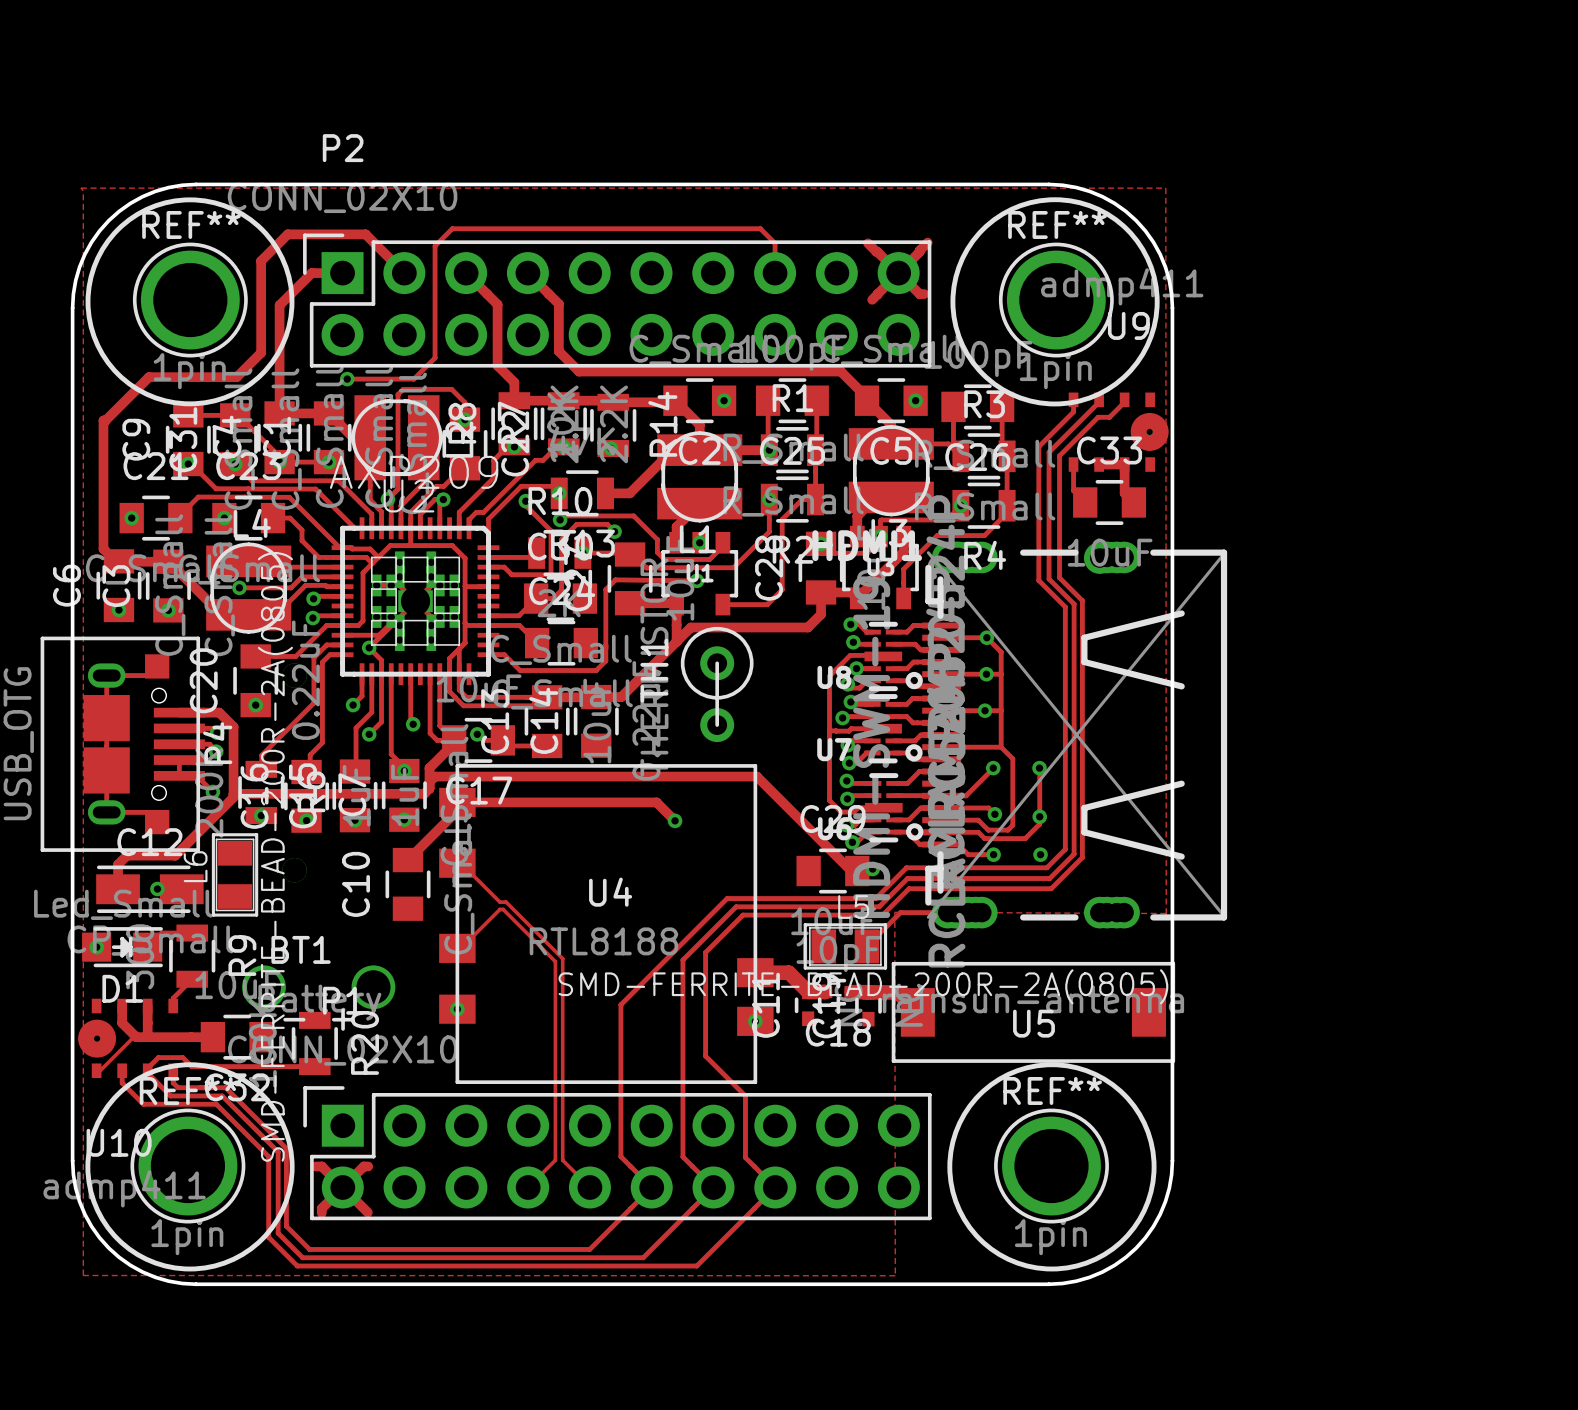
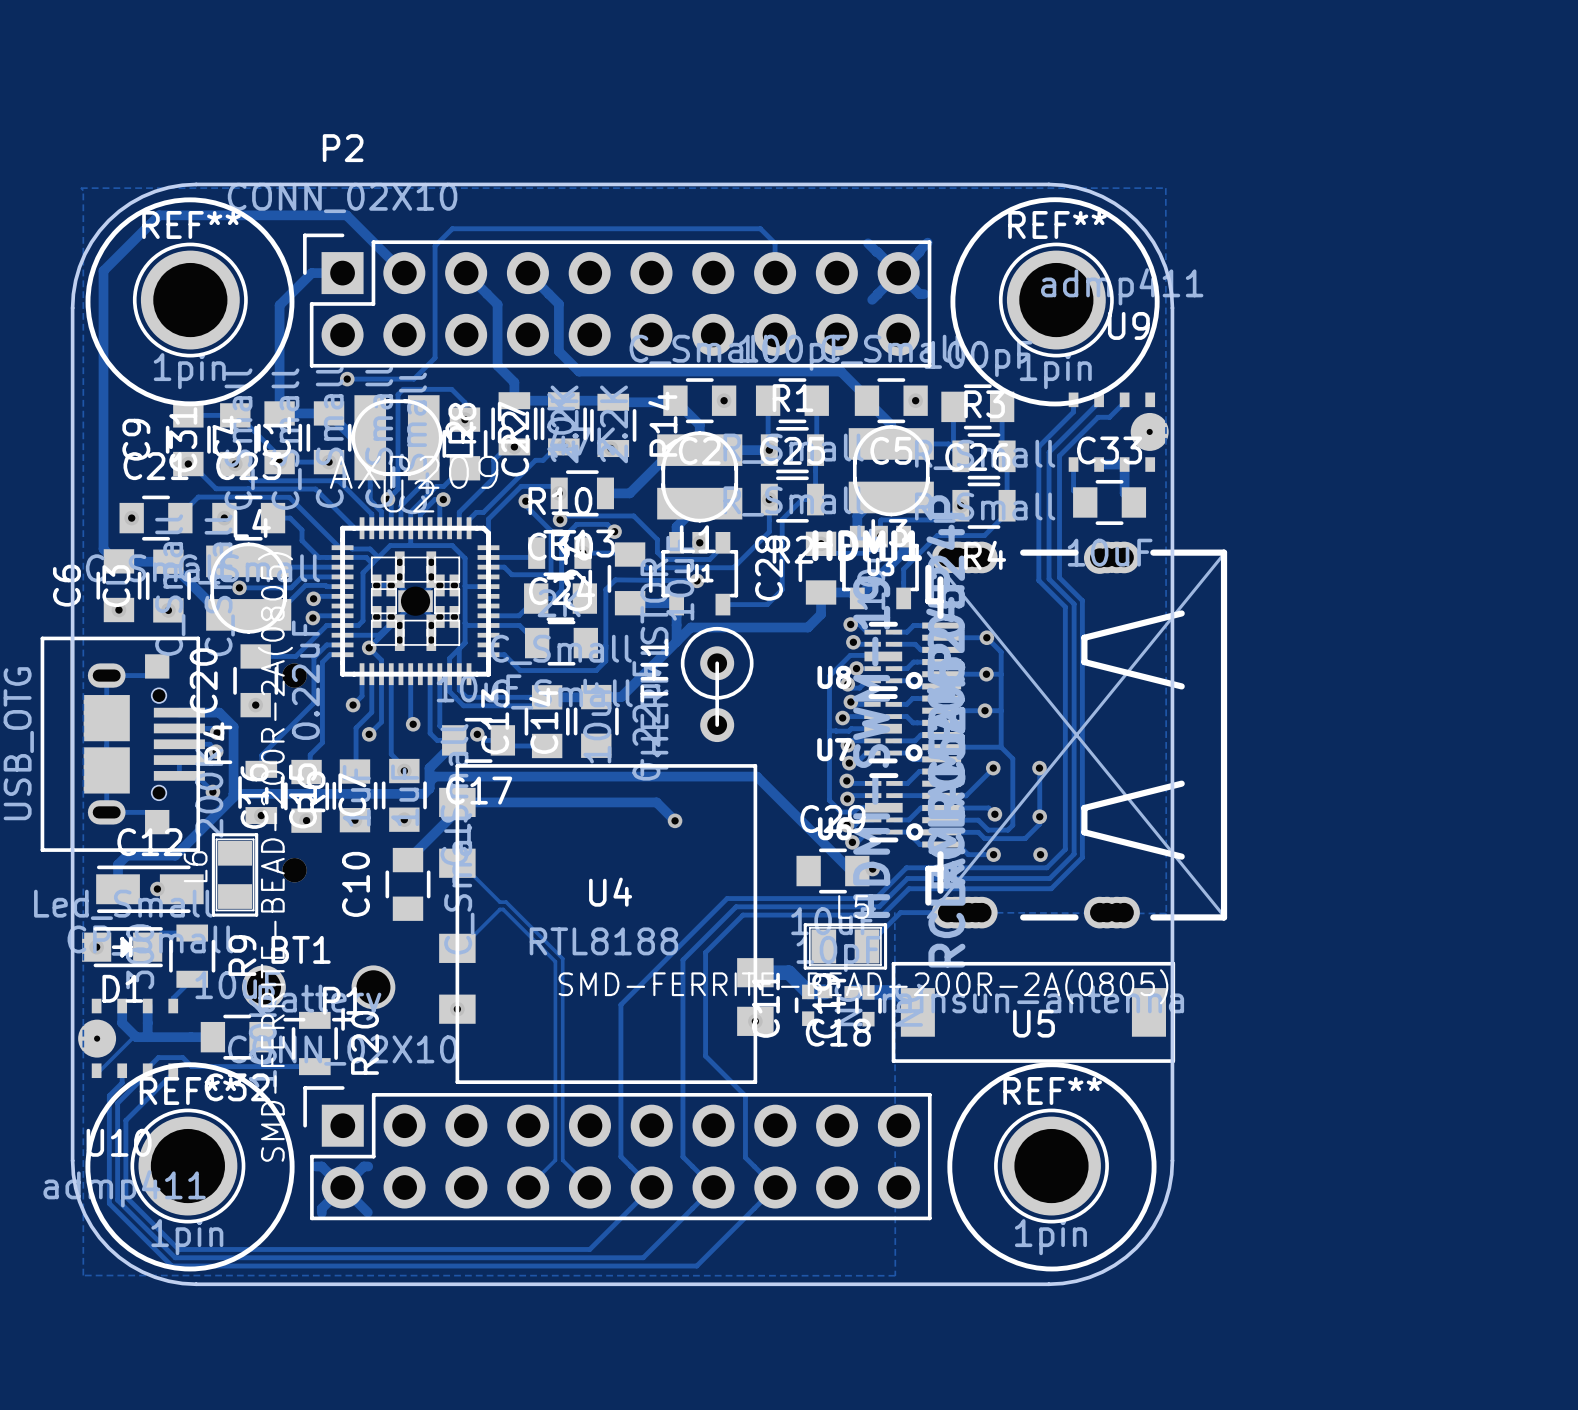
track: (365, 234) (287, 234) (261, 260) (261, 352) (236, 377) (148, 377) (103, 420) -> (365, 234) (346, 215) (159, 215) (103, 270) (103, 420)
track: (147, 1073) (170, 1095) (222, 1095) (278, 1151) (278, 1233) (302, 1257) -> (147, 1073) (117, 1103) (117, 1200) (175, 1257) (302, 1257)
track: (173, 1073) (173, 1082) (178, 1087) (225, 1087) (286, 1148) (286, 1226) (309, 1249) -> (173, 1073) (125, 1120) (125, 1196) (178, 1249) (309, 1249)
track: (122, 1082) (143, 1104) (216, 1104) (268, 1156) (268, 1237) (297, 1266) -> (122, 1082) (109, 1095) (109, 1203) (171, 1266) (297, 1266)

